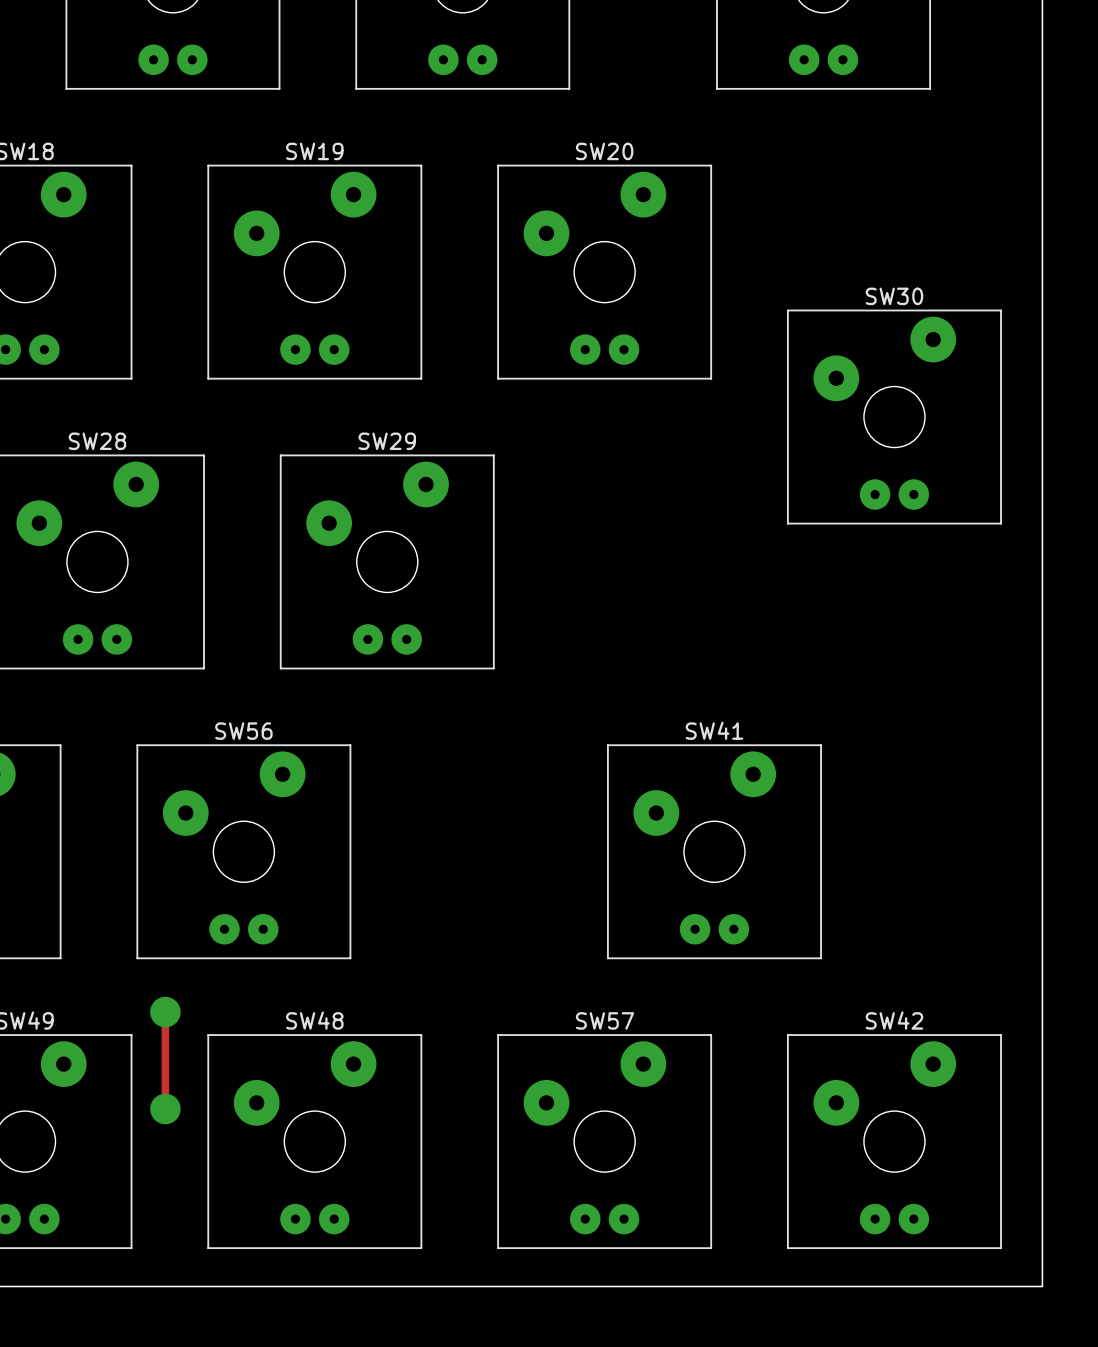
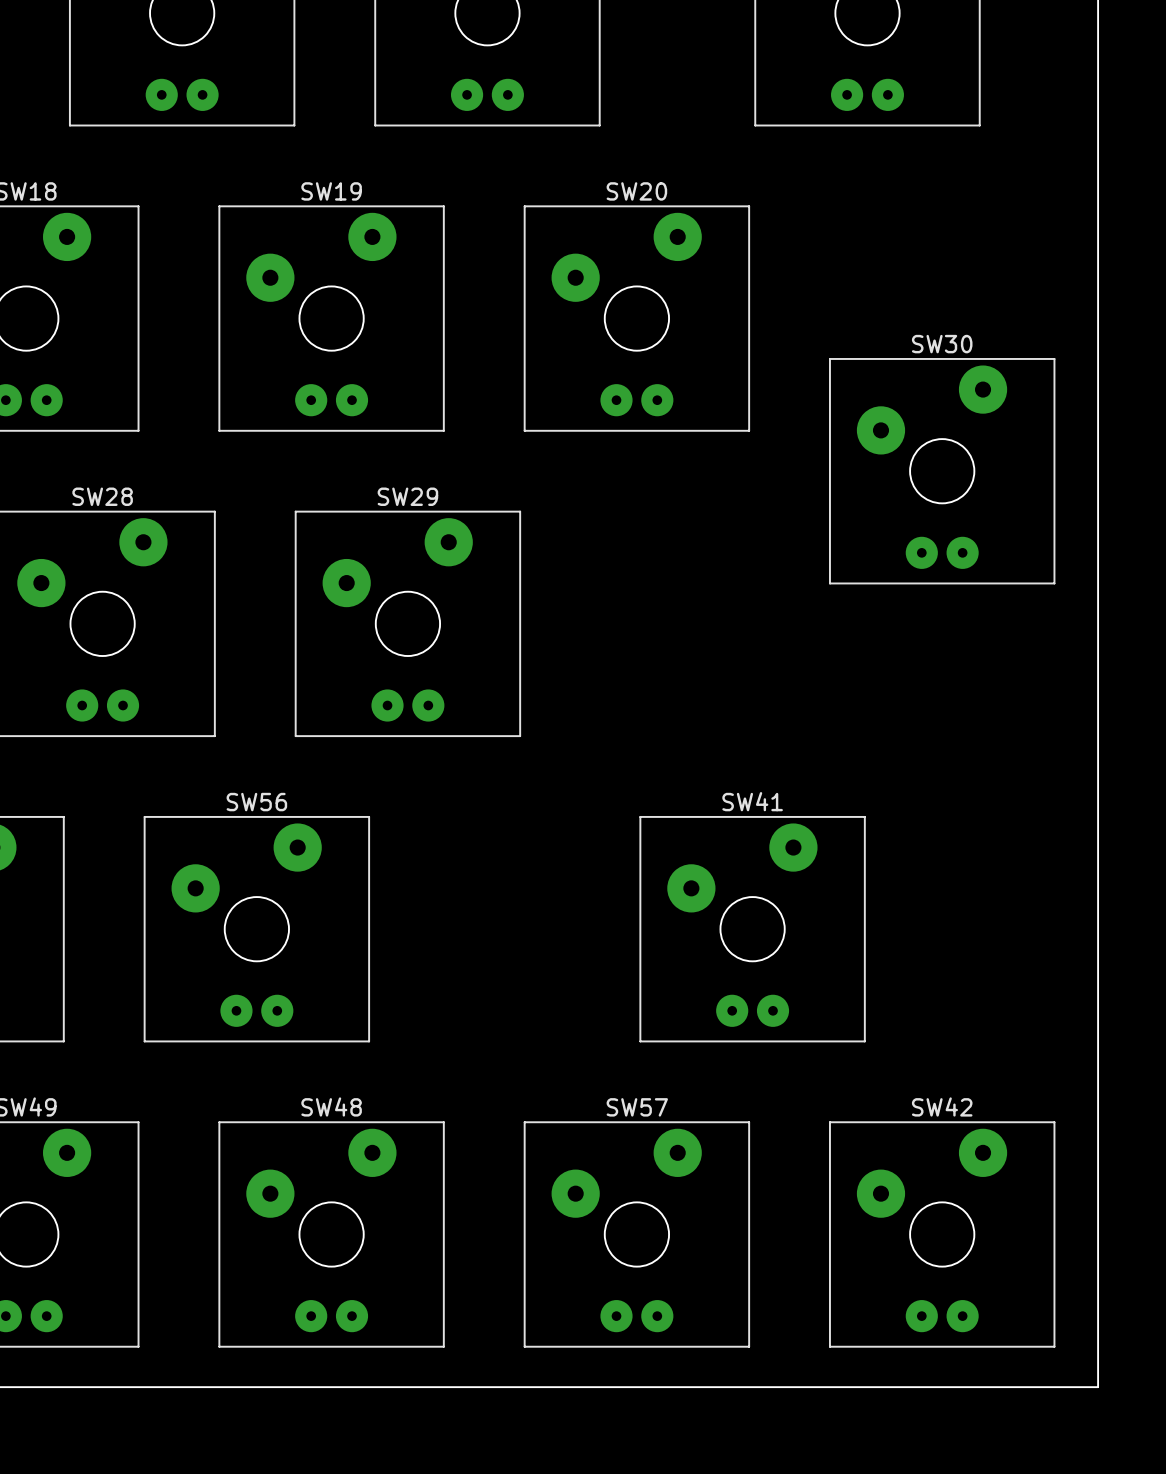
track: (165, 1012) (165, 1108) -> none
via: (165, 1012) -> none
via: (165, 1108) -> none

